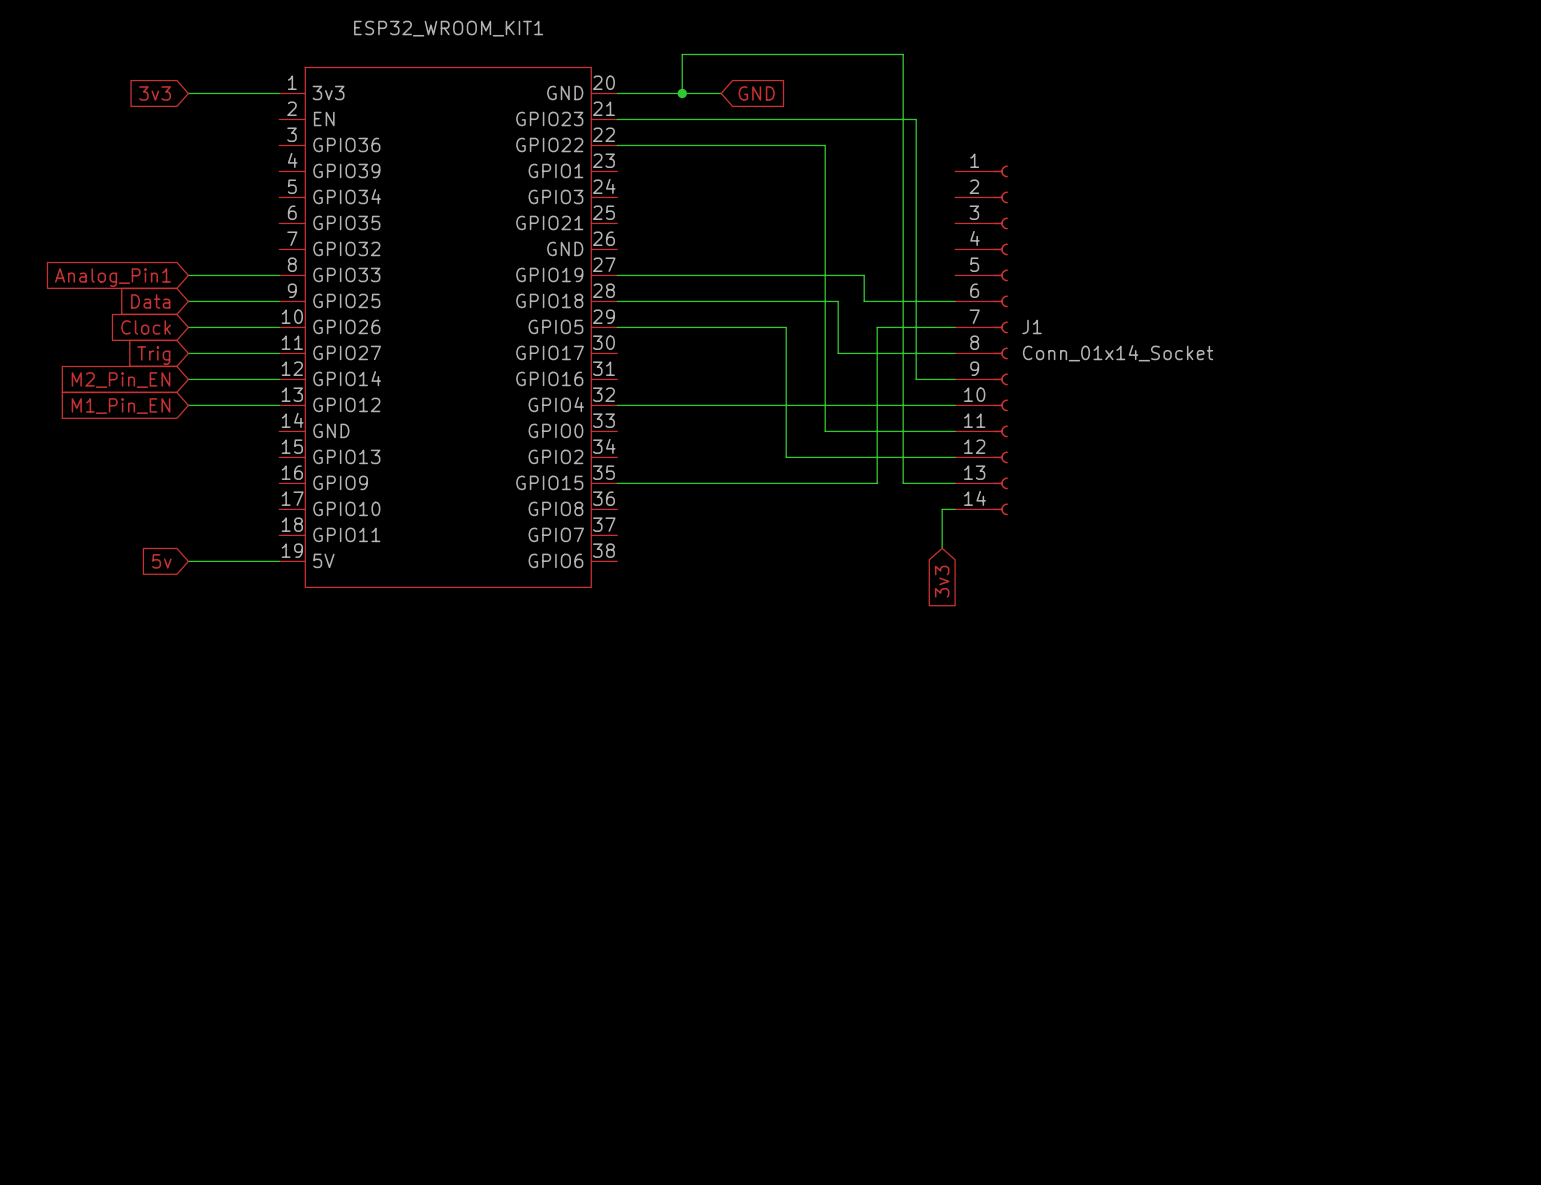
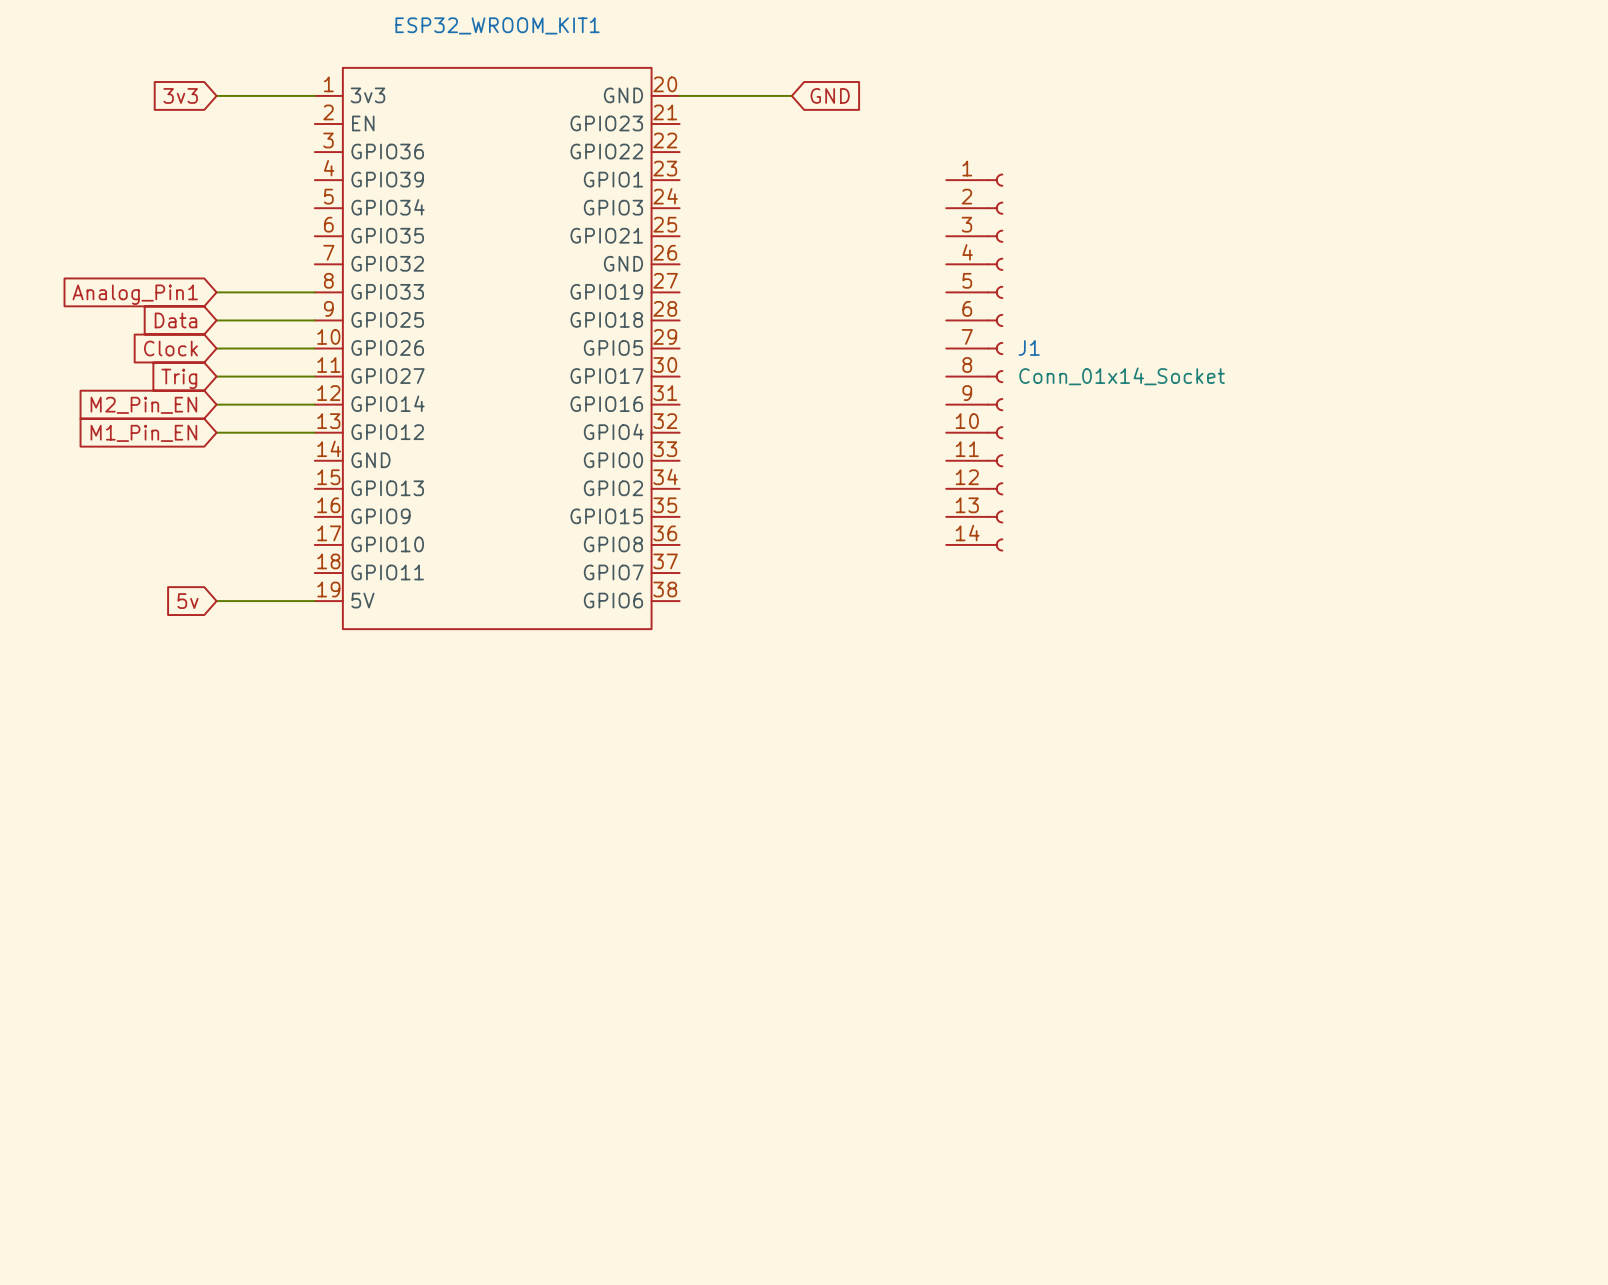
wire: (682, 93) (682, 54) (903, 54) (903, 483) (955, 483) -> none
junction: (682, 93) -> none
wire: (617, 119) (916, 119) (916, 379) (955, 379) -> none
wire: (617, 145) (825, 145) (825, 431) (955, 431) -> none
wire: (617, 275) (864, 275) (864, 301) (955, 301) -> none
wire: (617, 301) (838, 301) (838, 353) (955, 353) -> none
wire: (617, 327) (786, 327) (786, 457) (955, 457) -> none
wire: (955, 327) (877, 327) (877, 483) (617, 483) -> none
J1 position: (981, 340) -> (974, 362)
wire: (617, 405) (955, 405) -> none
wire: (955, 509) (942, 509) (942, 548) -> none
global label: 3v3 (942, 581) -> none

